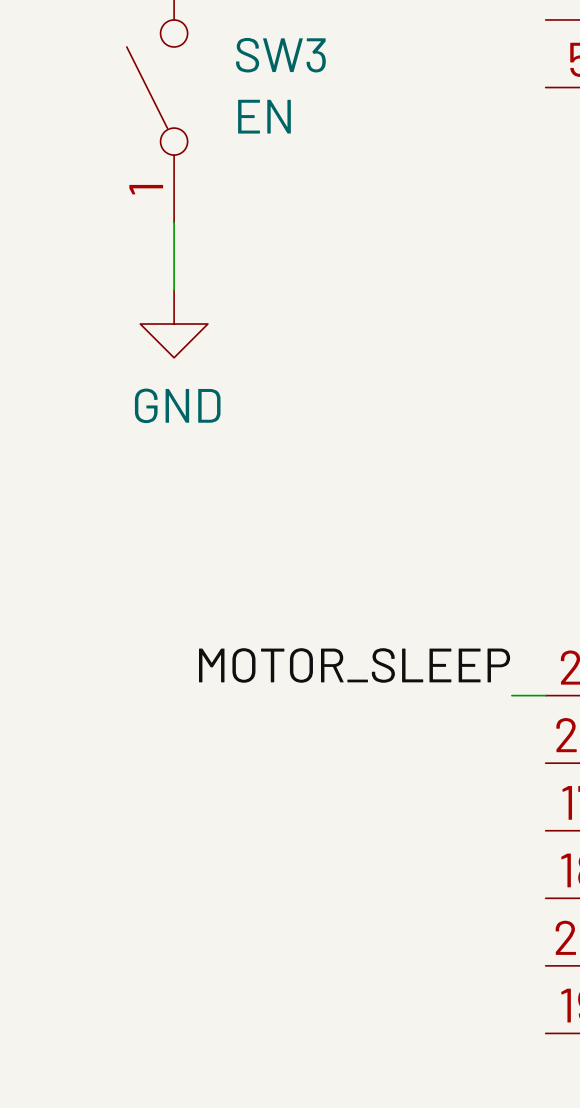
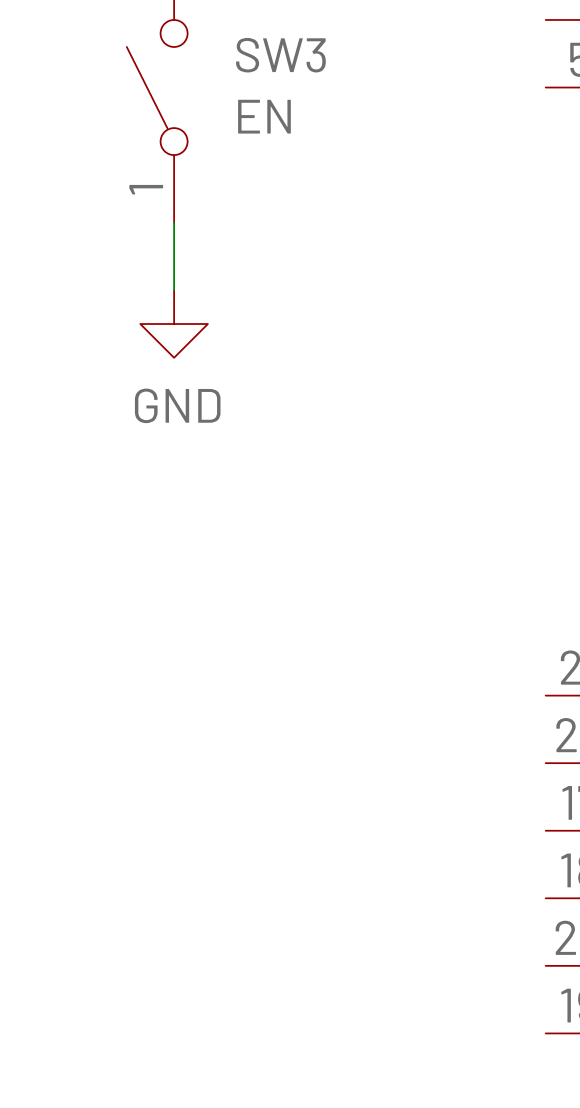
label: MOTOR_SLEEP (354, 665) -> none
wire: (511, 695) (545, 695) -> none

